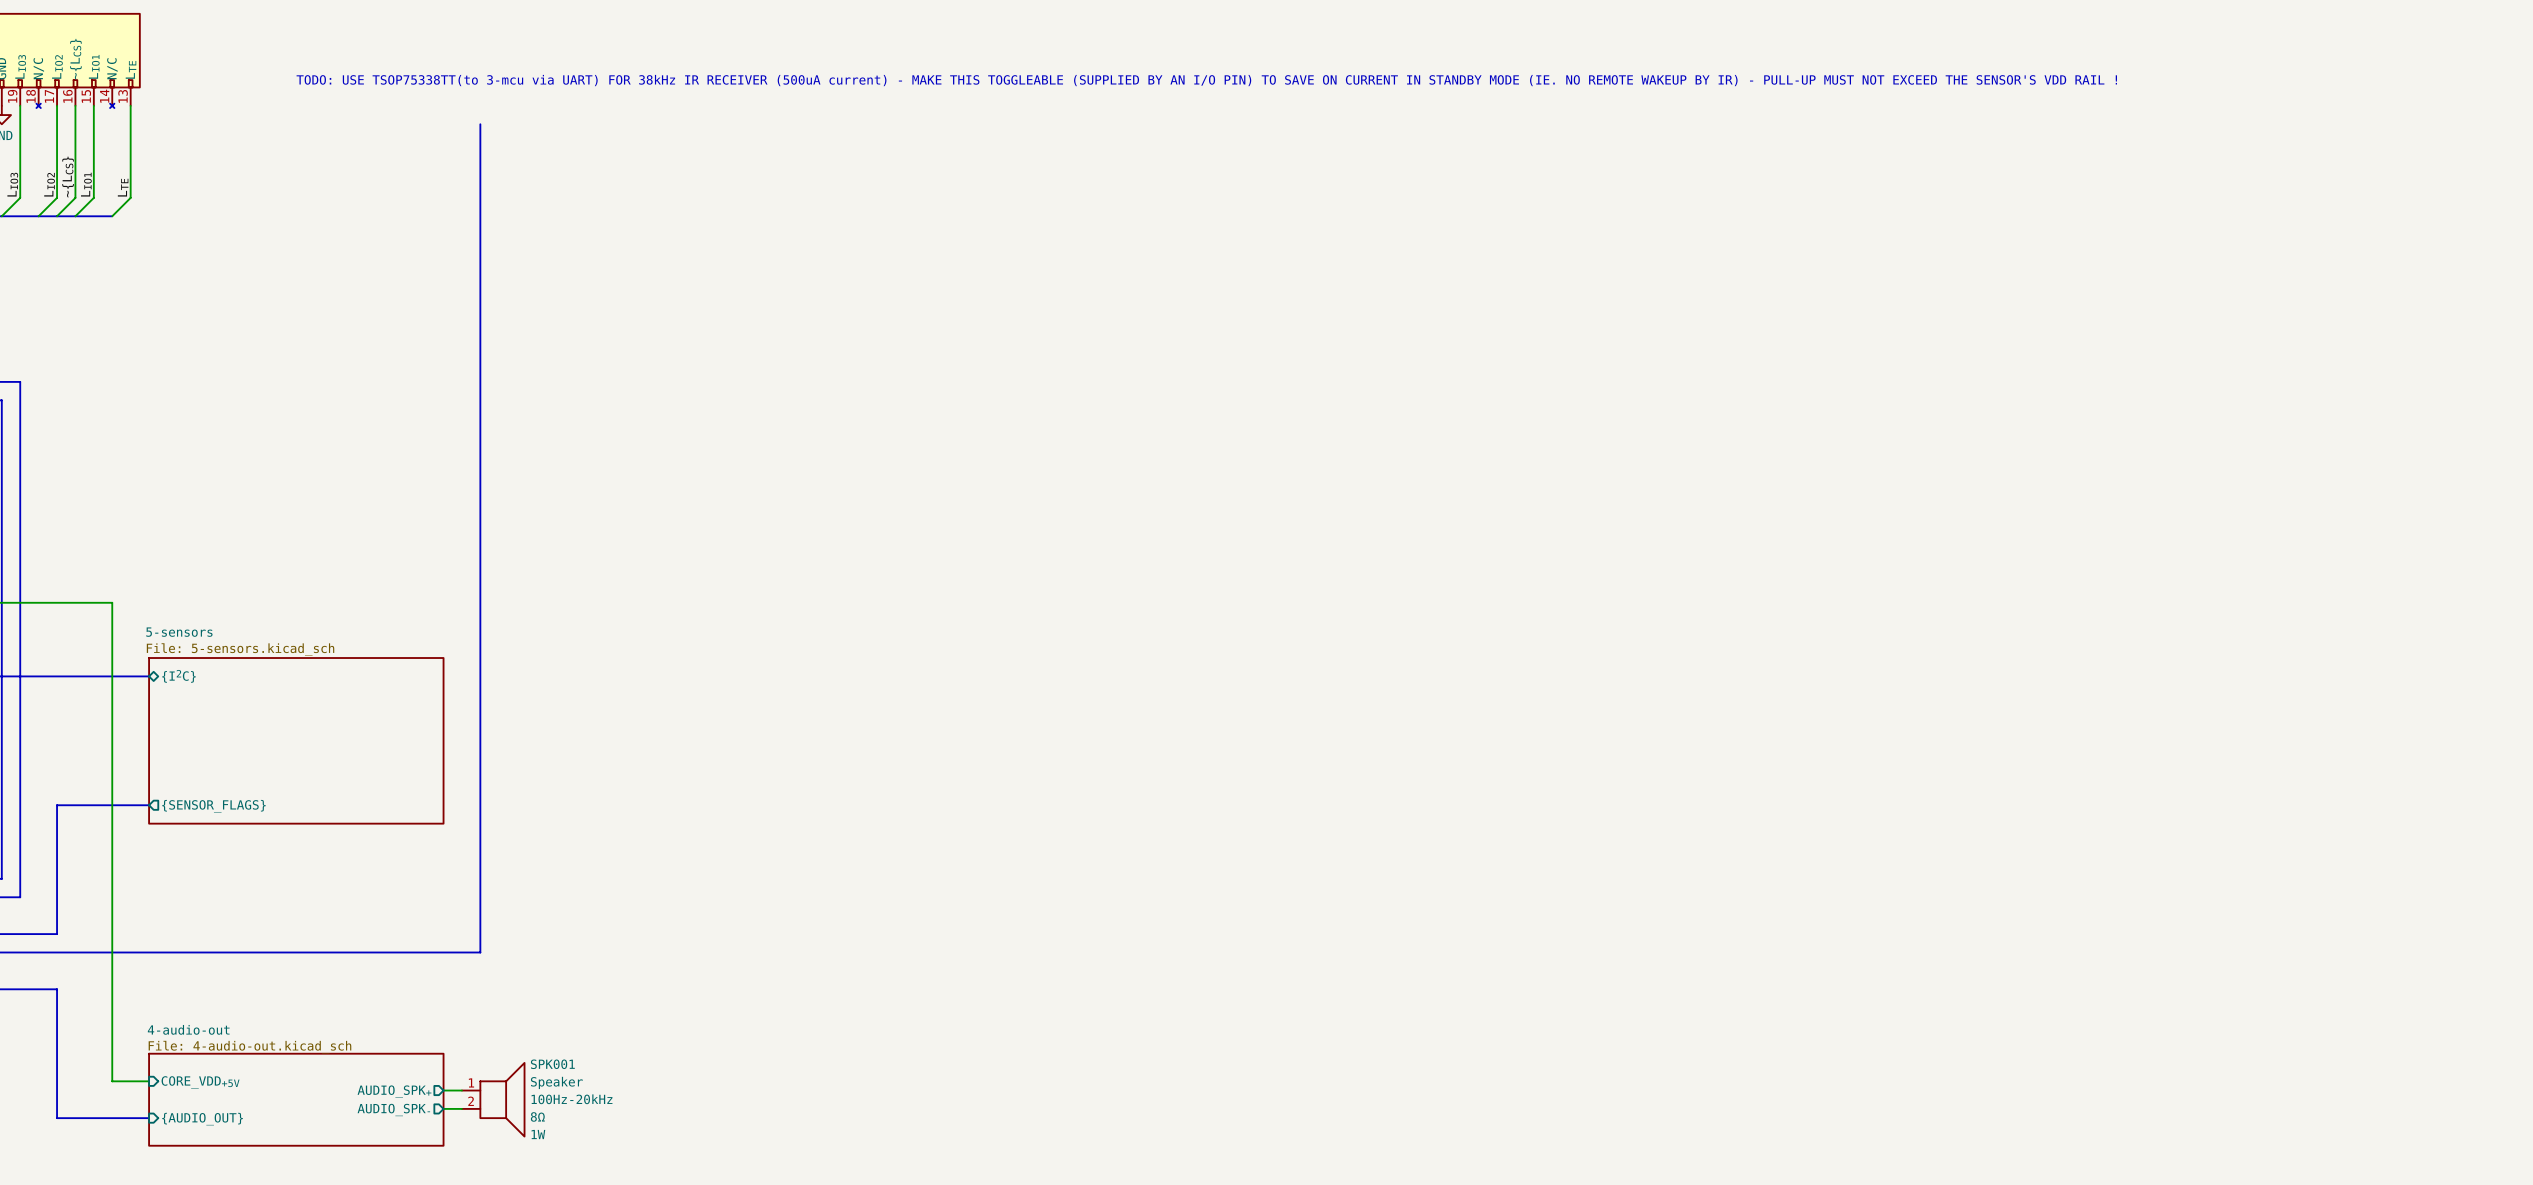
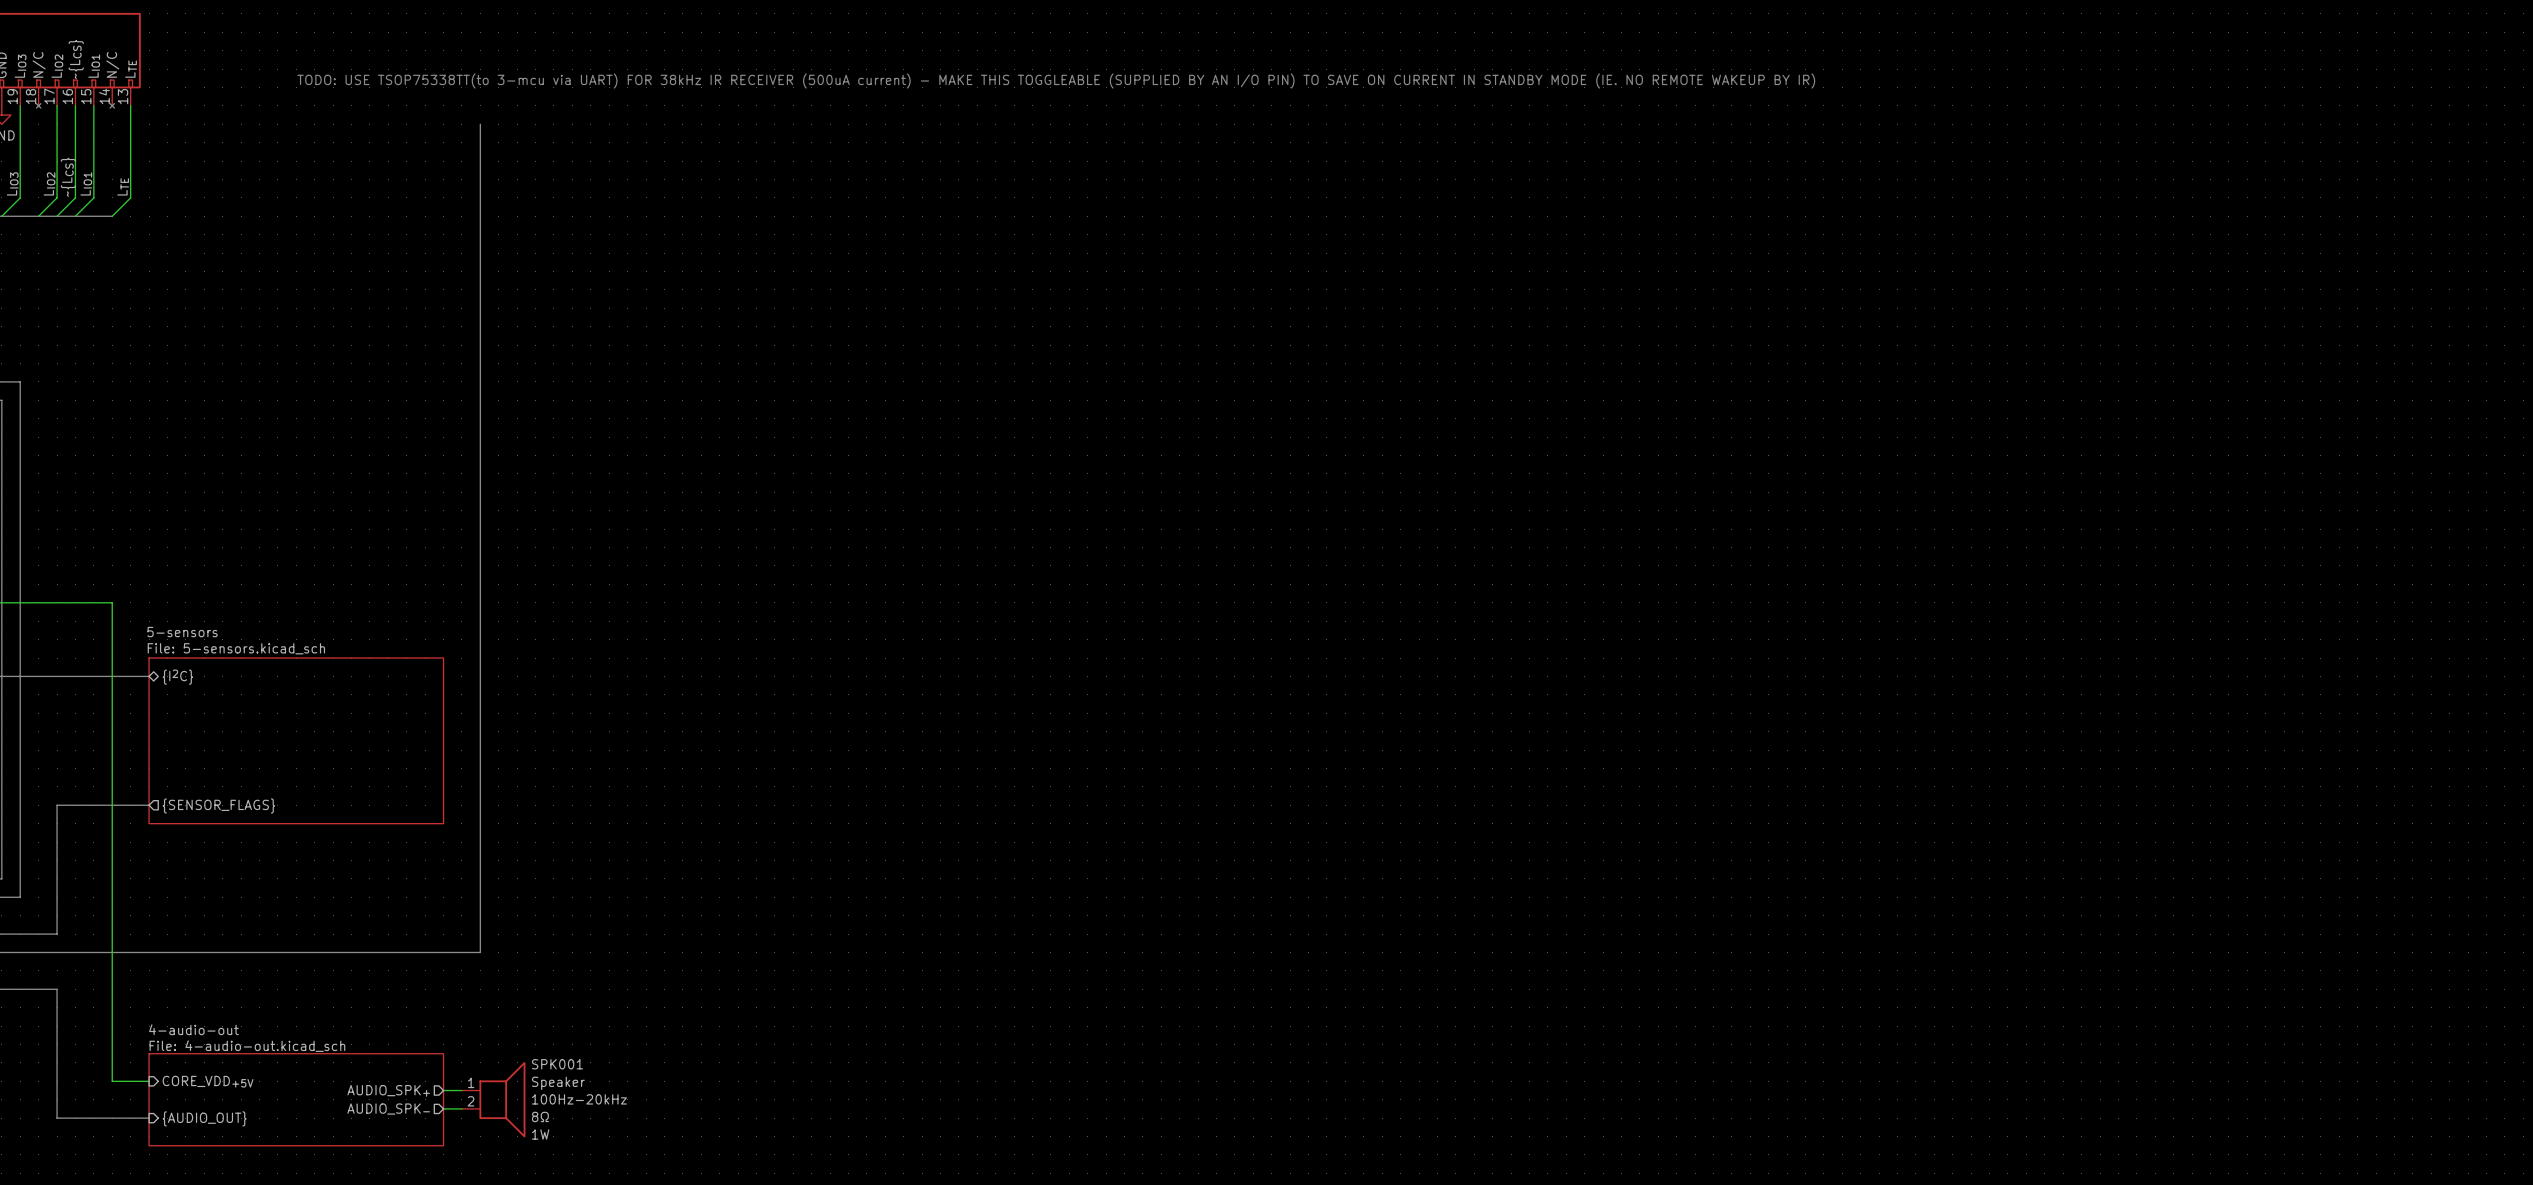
text: TODO: USE TSOP75338TT(to 3-mcu via UART) FOR 38kHz IR RECEIVER (500uA current) - MAKE THIS TOGGLEABLE (SUPPLIED BY AN I/O PIN) TO SAVE ON CURRENT IN STANDBY MODE (IE. NO REMOTE WAKEUP BY IR) - PULL-UP MUST NOT EXCEED THE SENSOR'S VDD RAIL ! (1206, 80) -> TODO: USE TSOP75338TT(to 3-mcu via UART) FOR 38kHz IR RECEIVER (500uA current) - MAKE THIS TOGGLEABLE (SUPPLIED BY AN I/O PIN) TO SAVE ON CURRENT IN STANDBY MODE (IE. NO REMOTE WAKEUP BY IR) (1056, 81)

